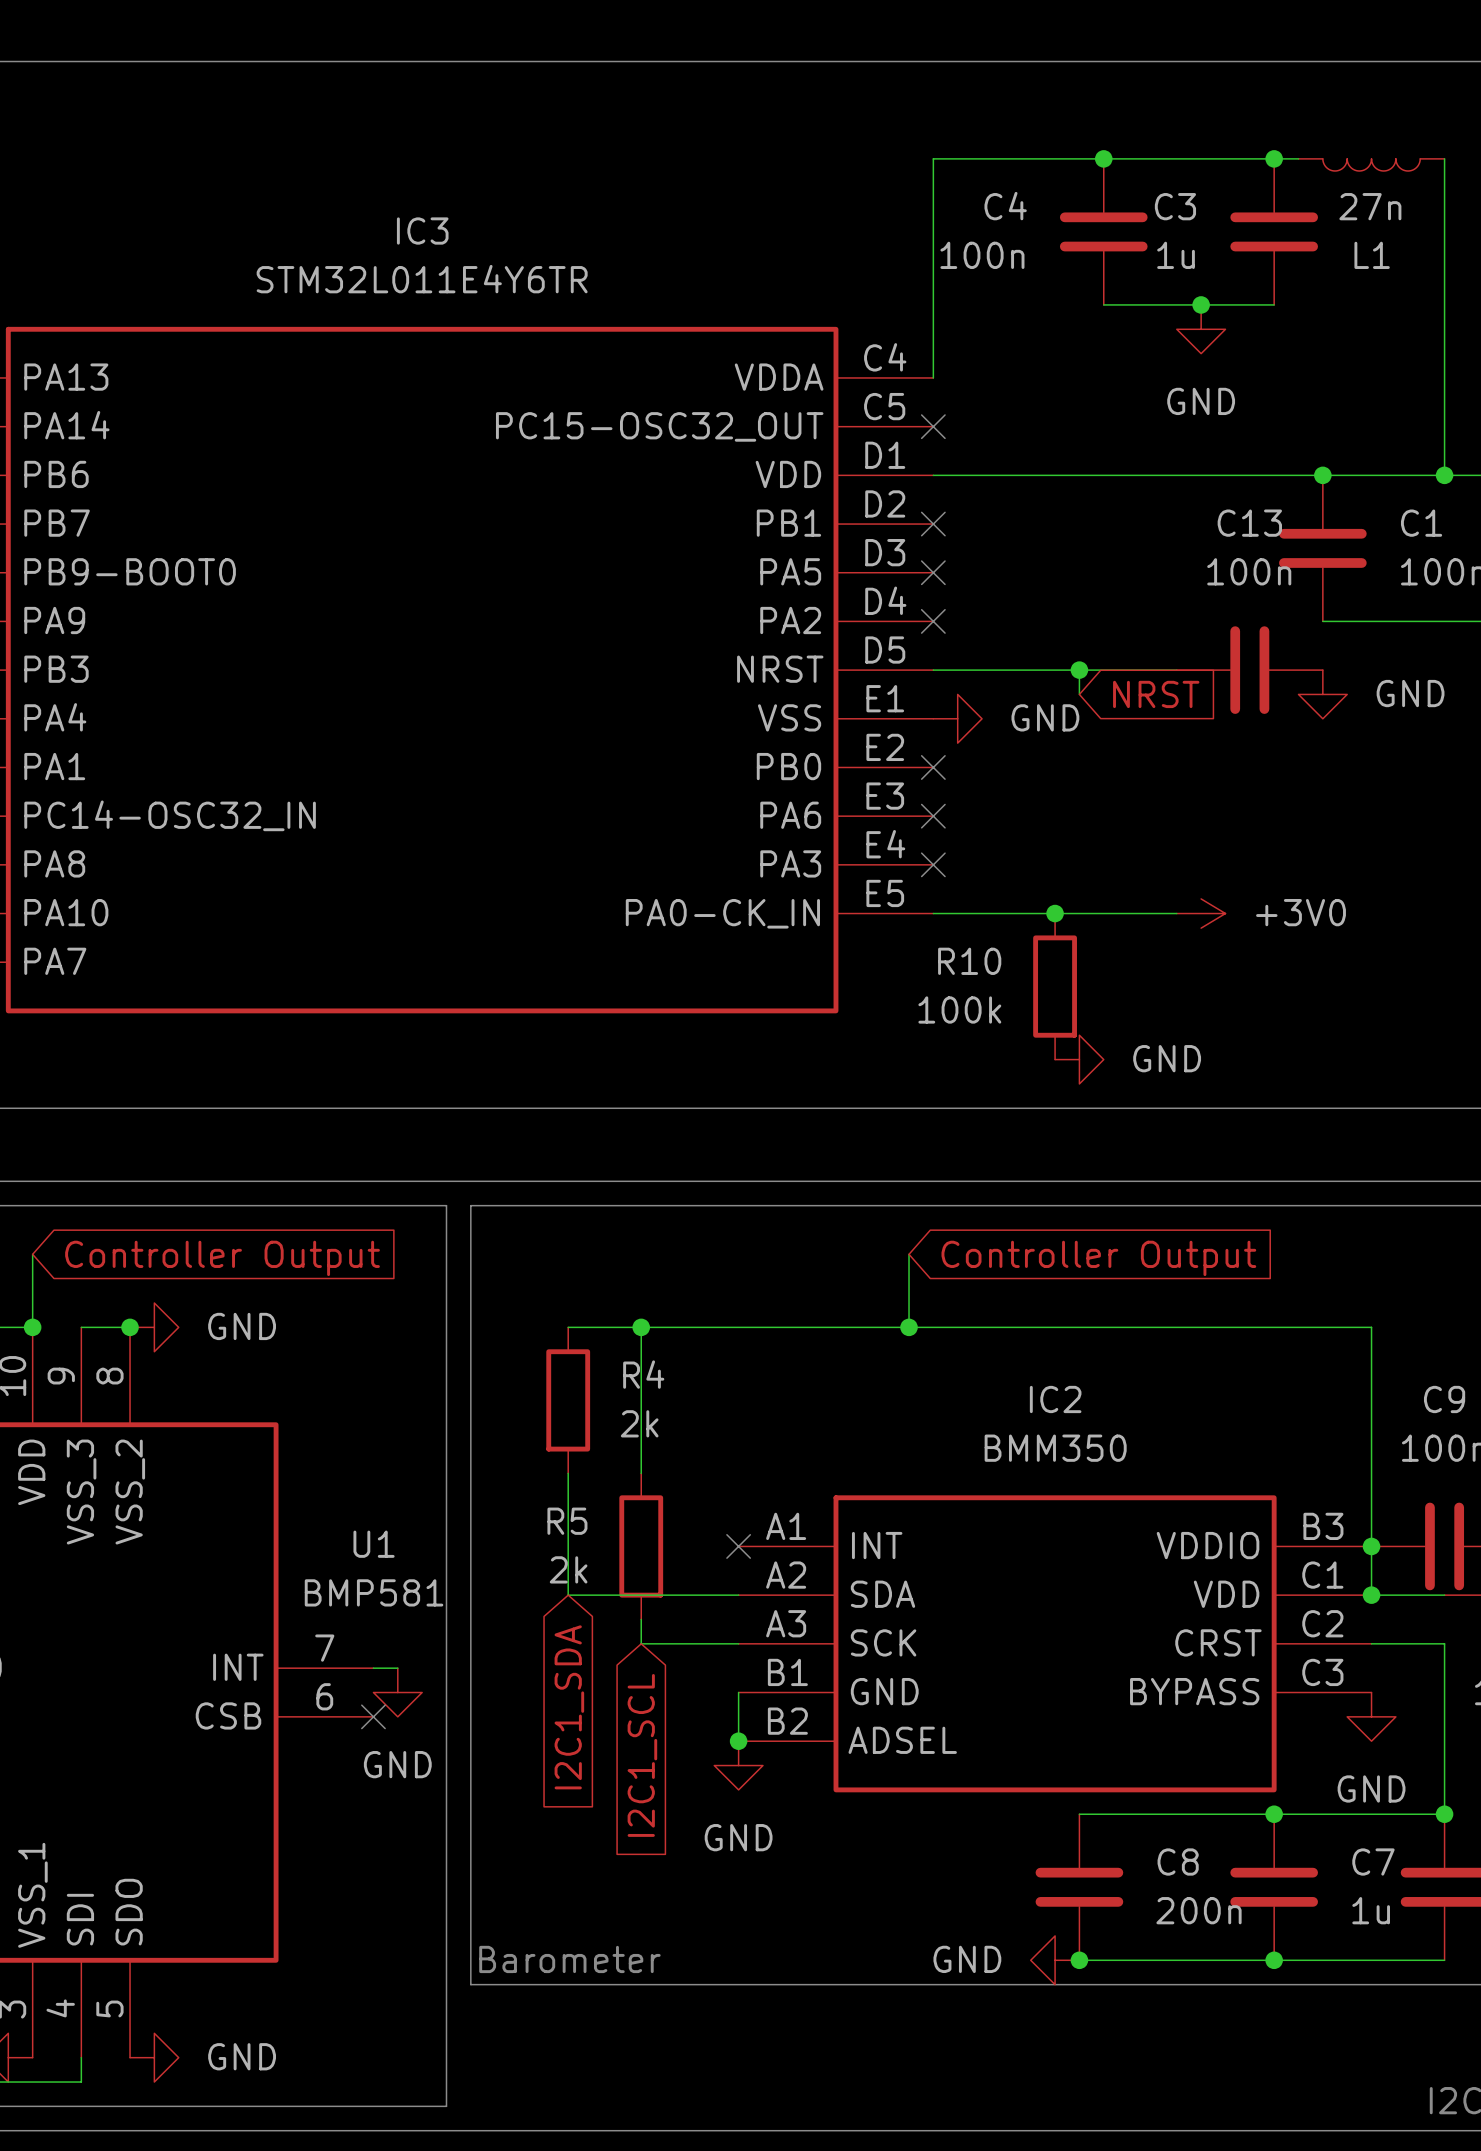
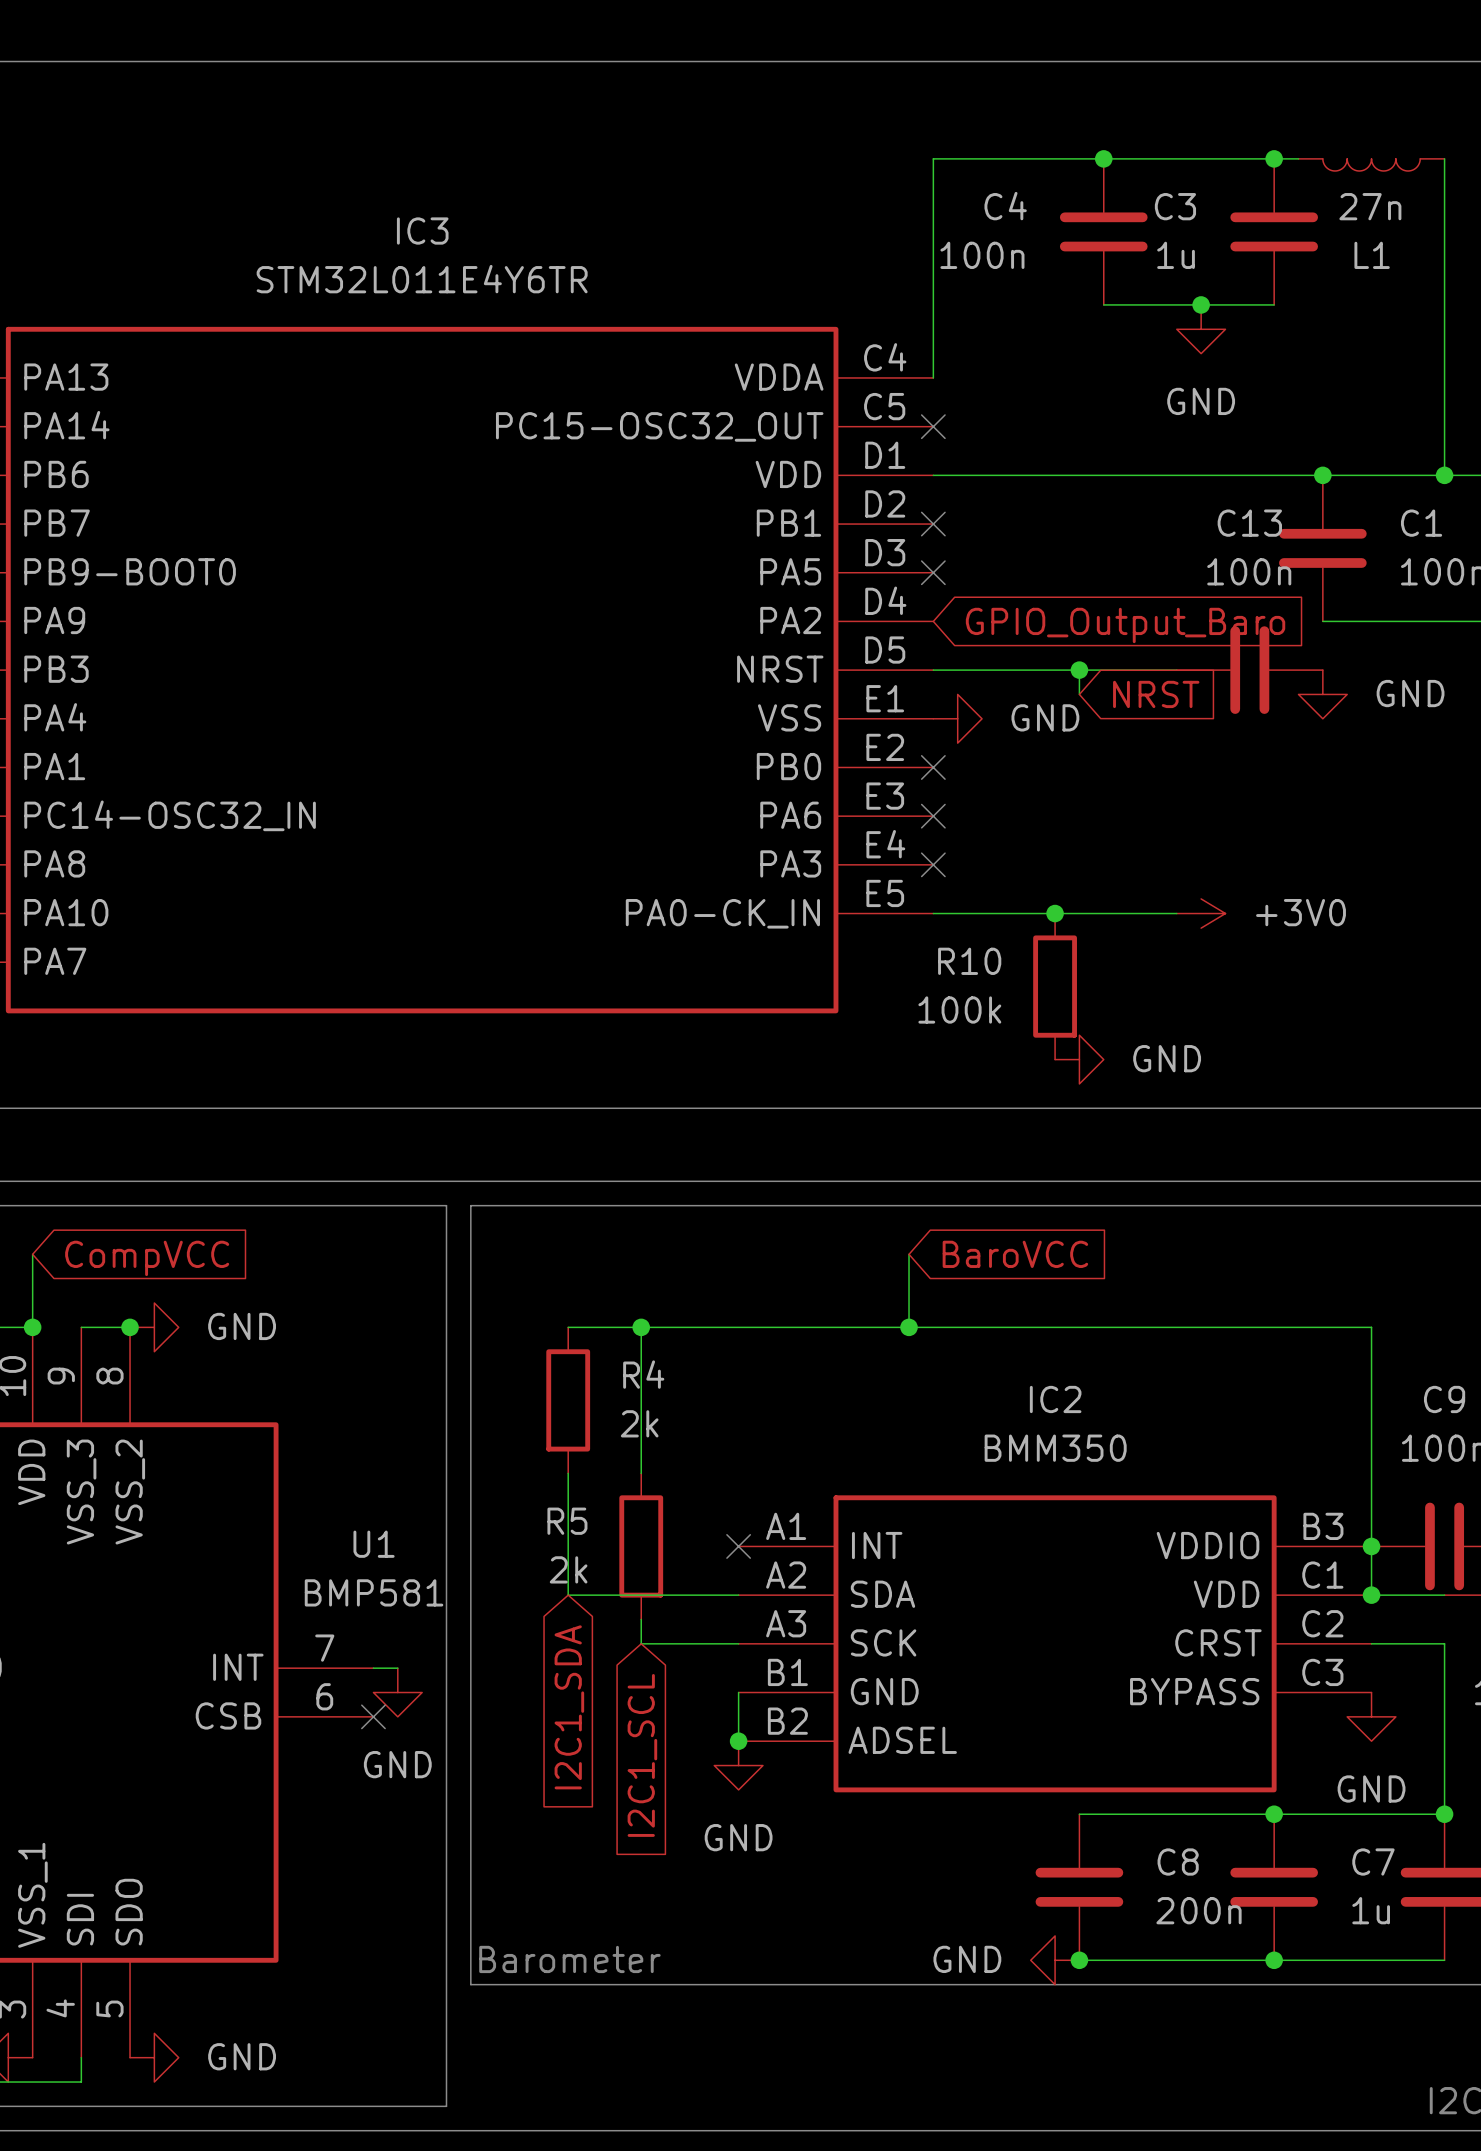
no-connect mark: (933, 621) -> none
global label: none -> GPIO_Output_Baro (1125, 625)
global label: Controller Output (222, 1258) -> CompVCC (147, 1258)
global label: Controller Output (1098, 1258) -> BaroVCC (1015, 1254)

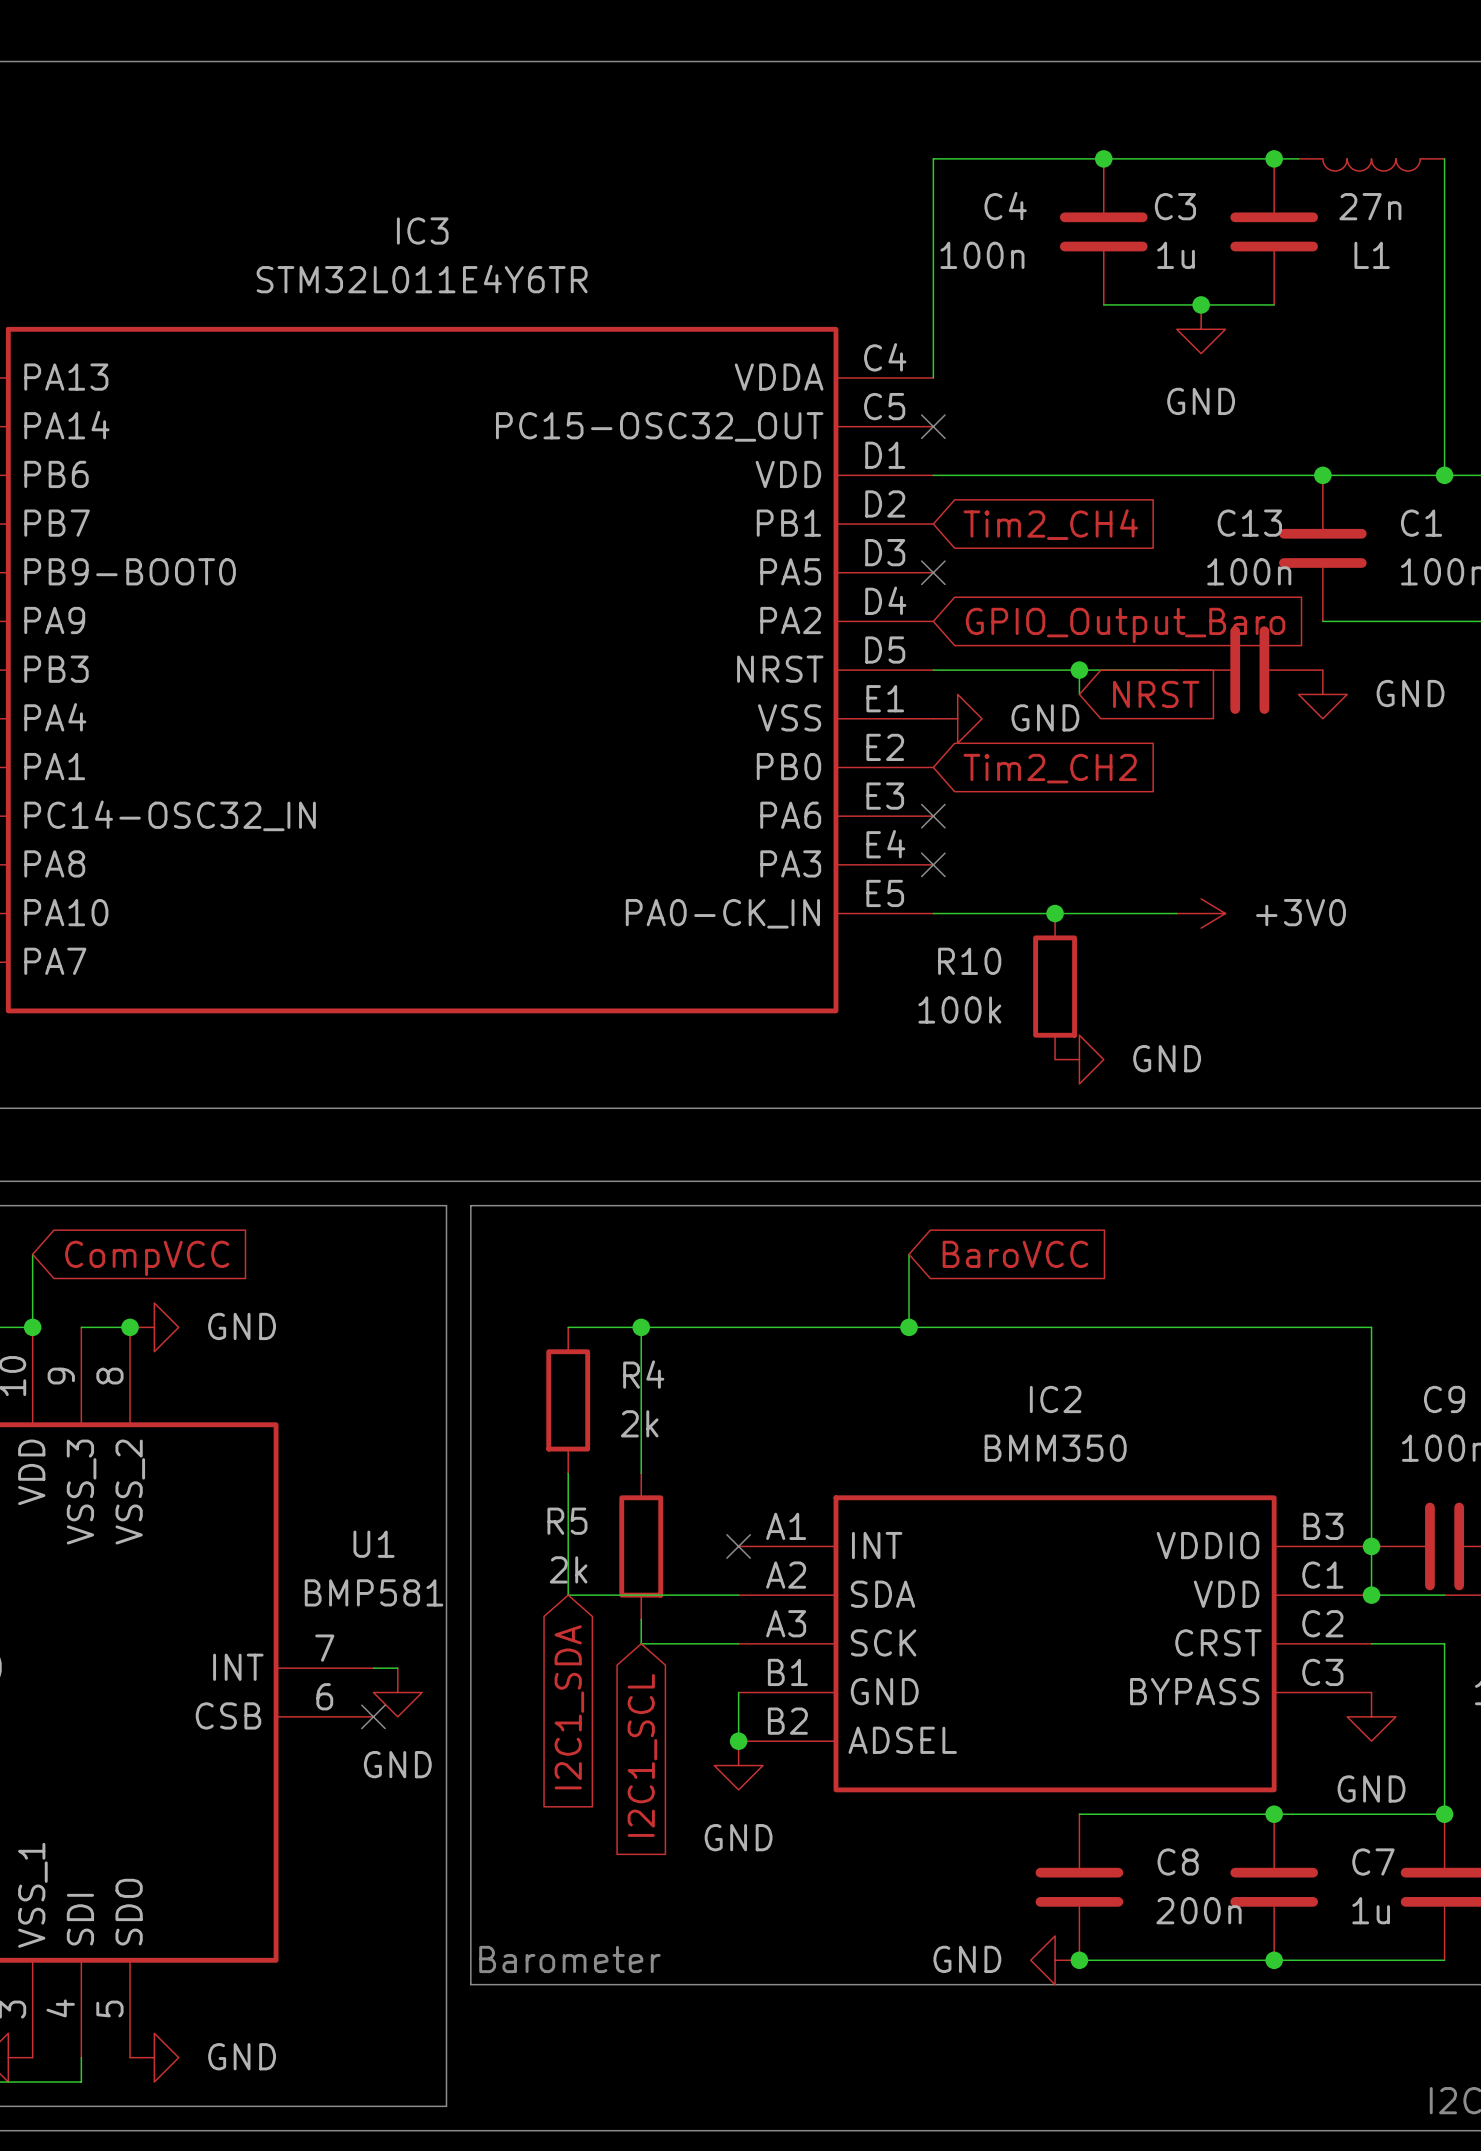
no-connect mark: (933, 524) -> none
global label: none -> Tim2_CH4 (1050, 524)
no-connect mark: (933, 767) -> none
global label: none -> Tim2_CH2 (1050, 768)

